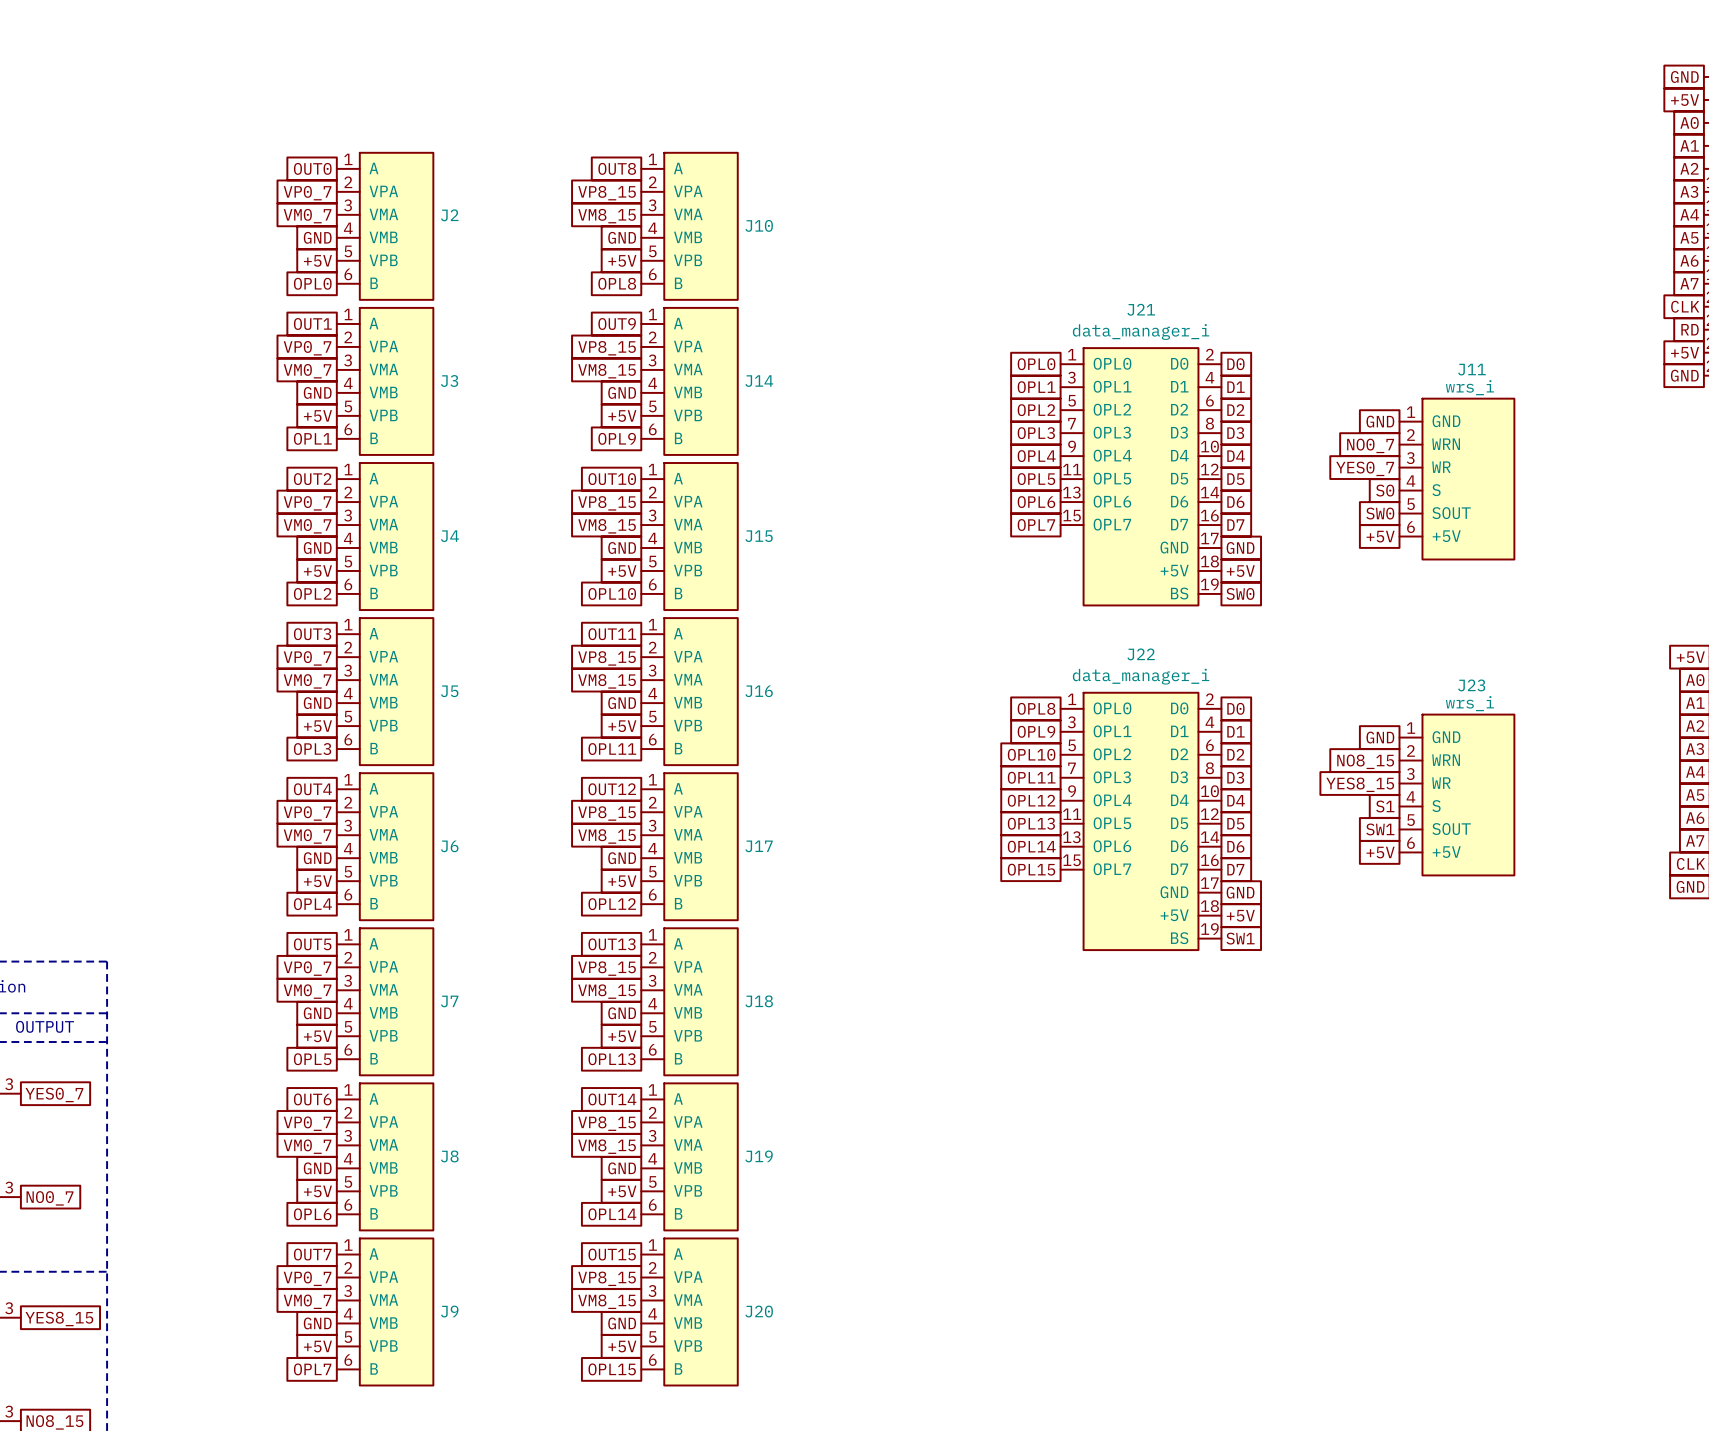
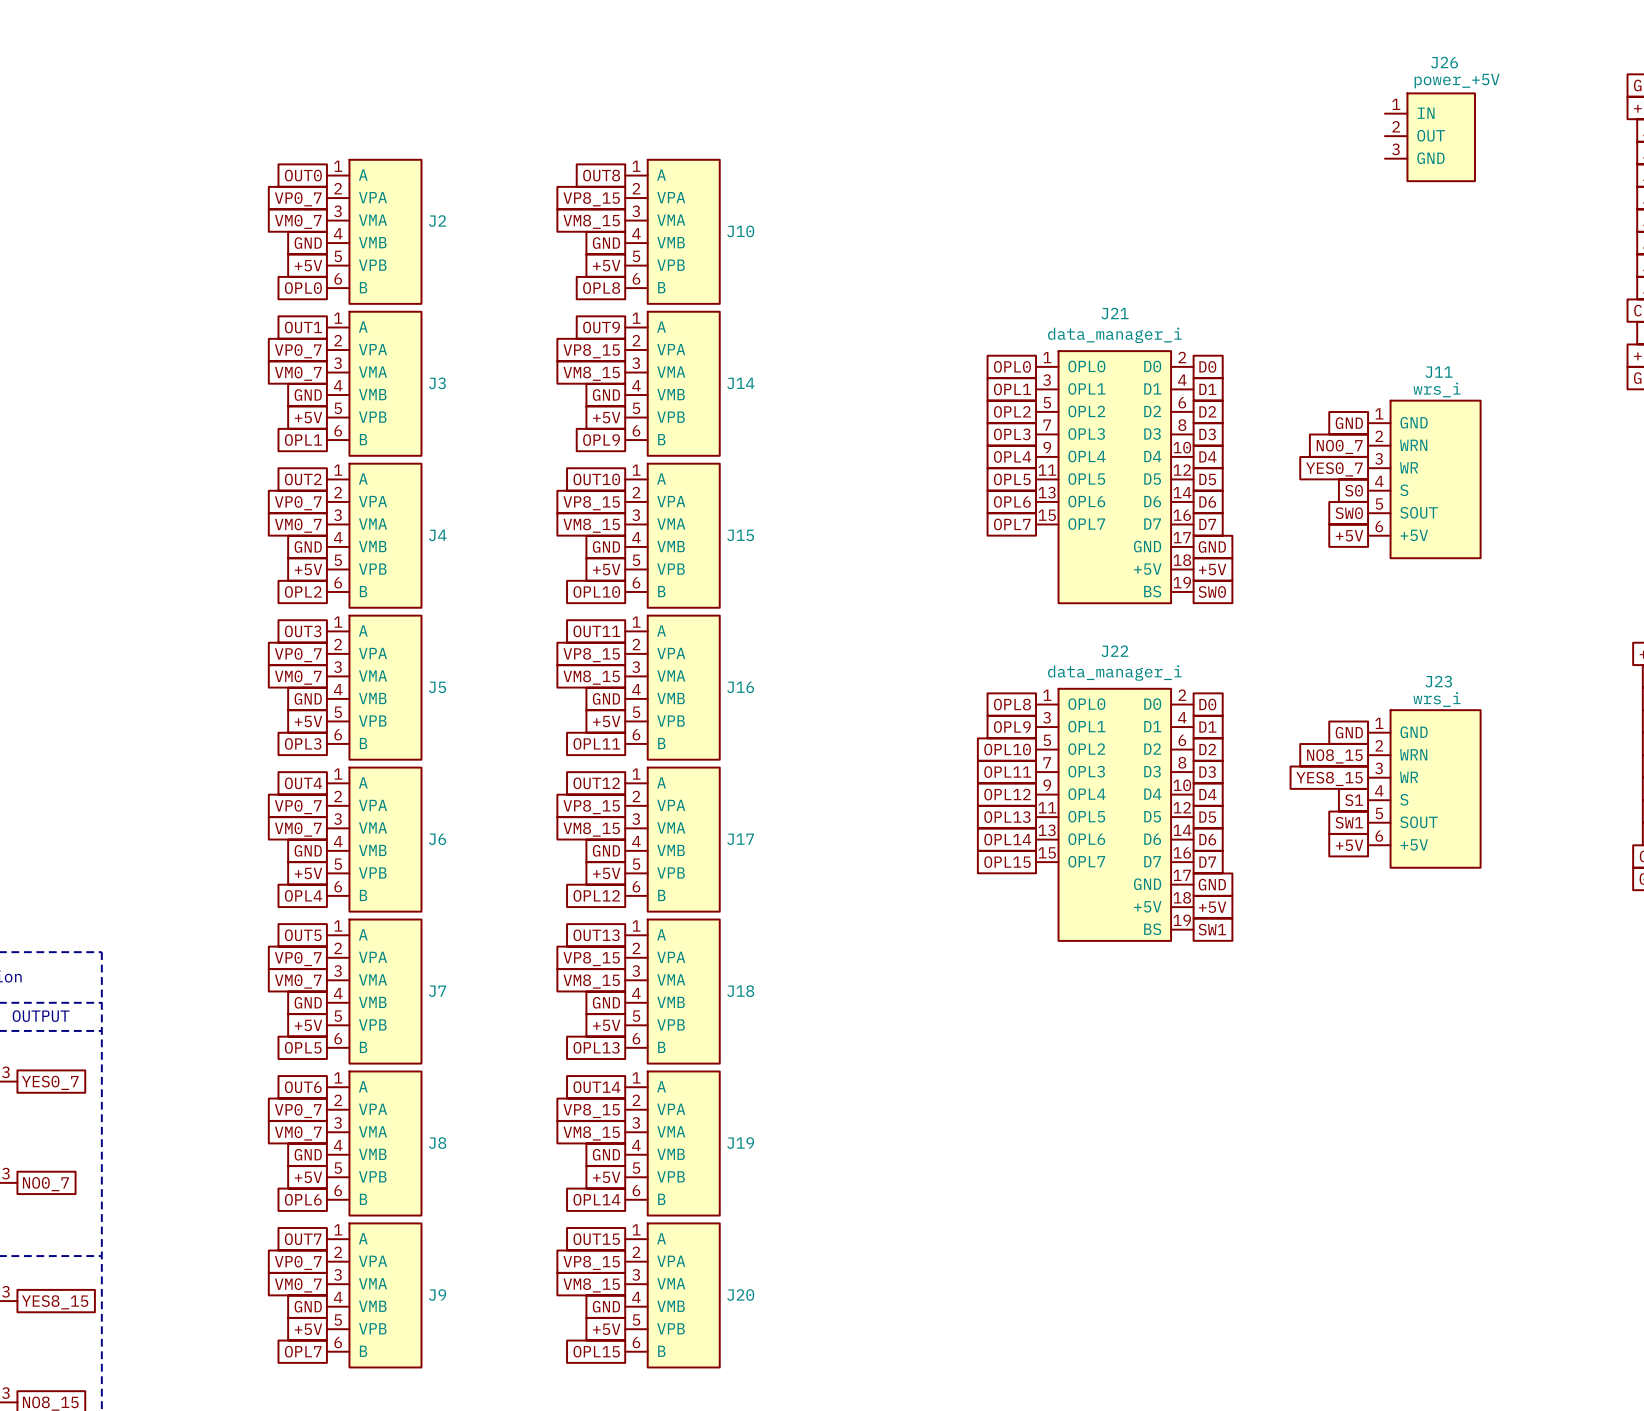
J26: none -> power_+5V (1429, 137)

